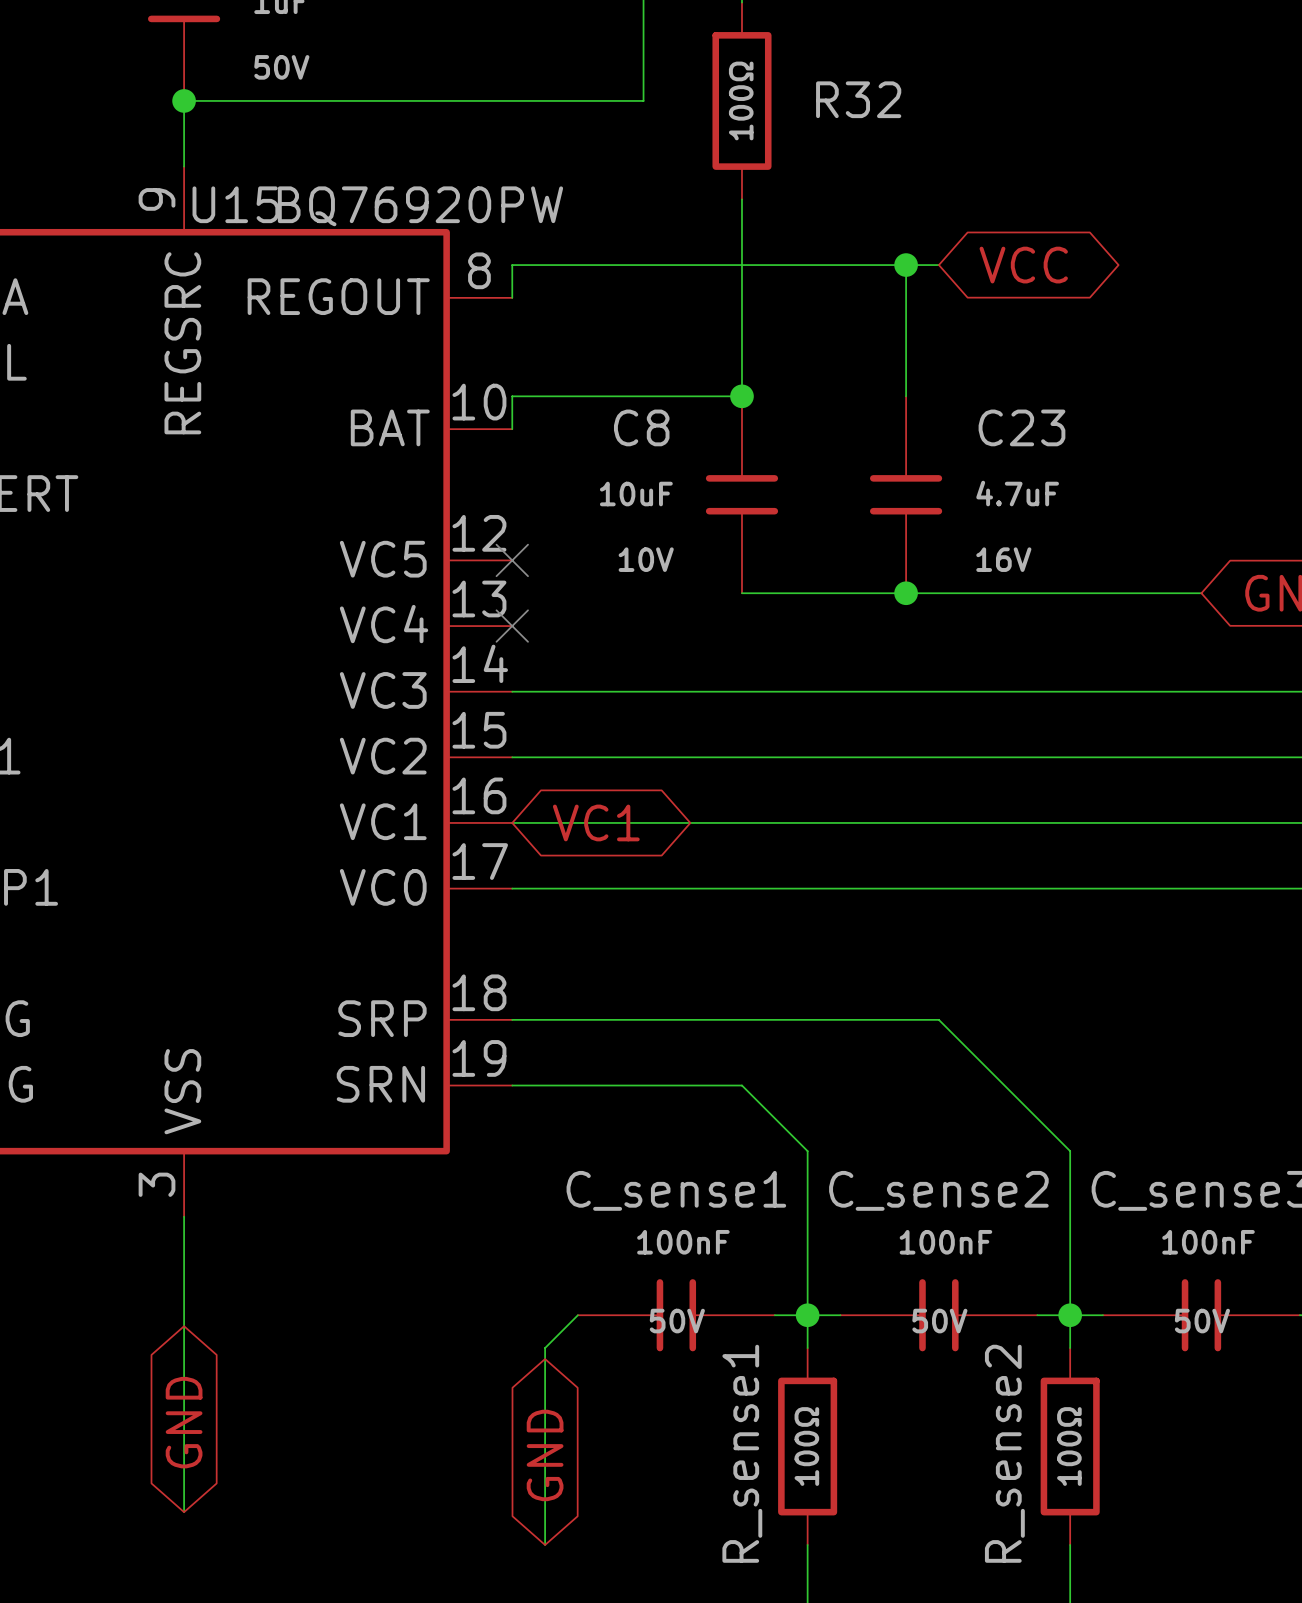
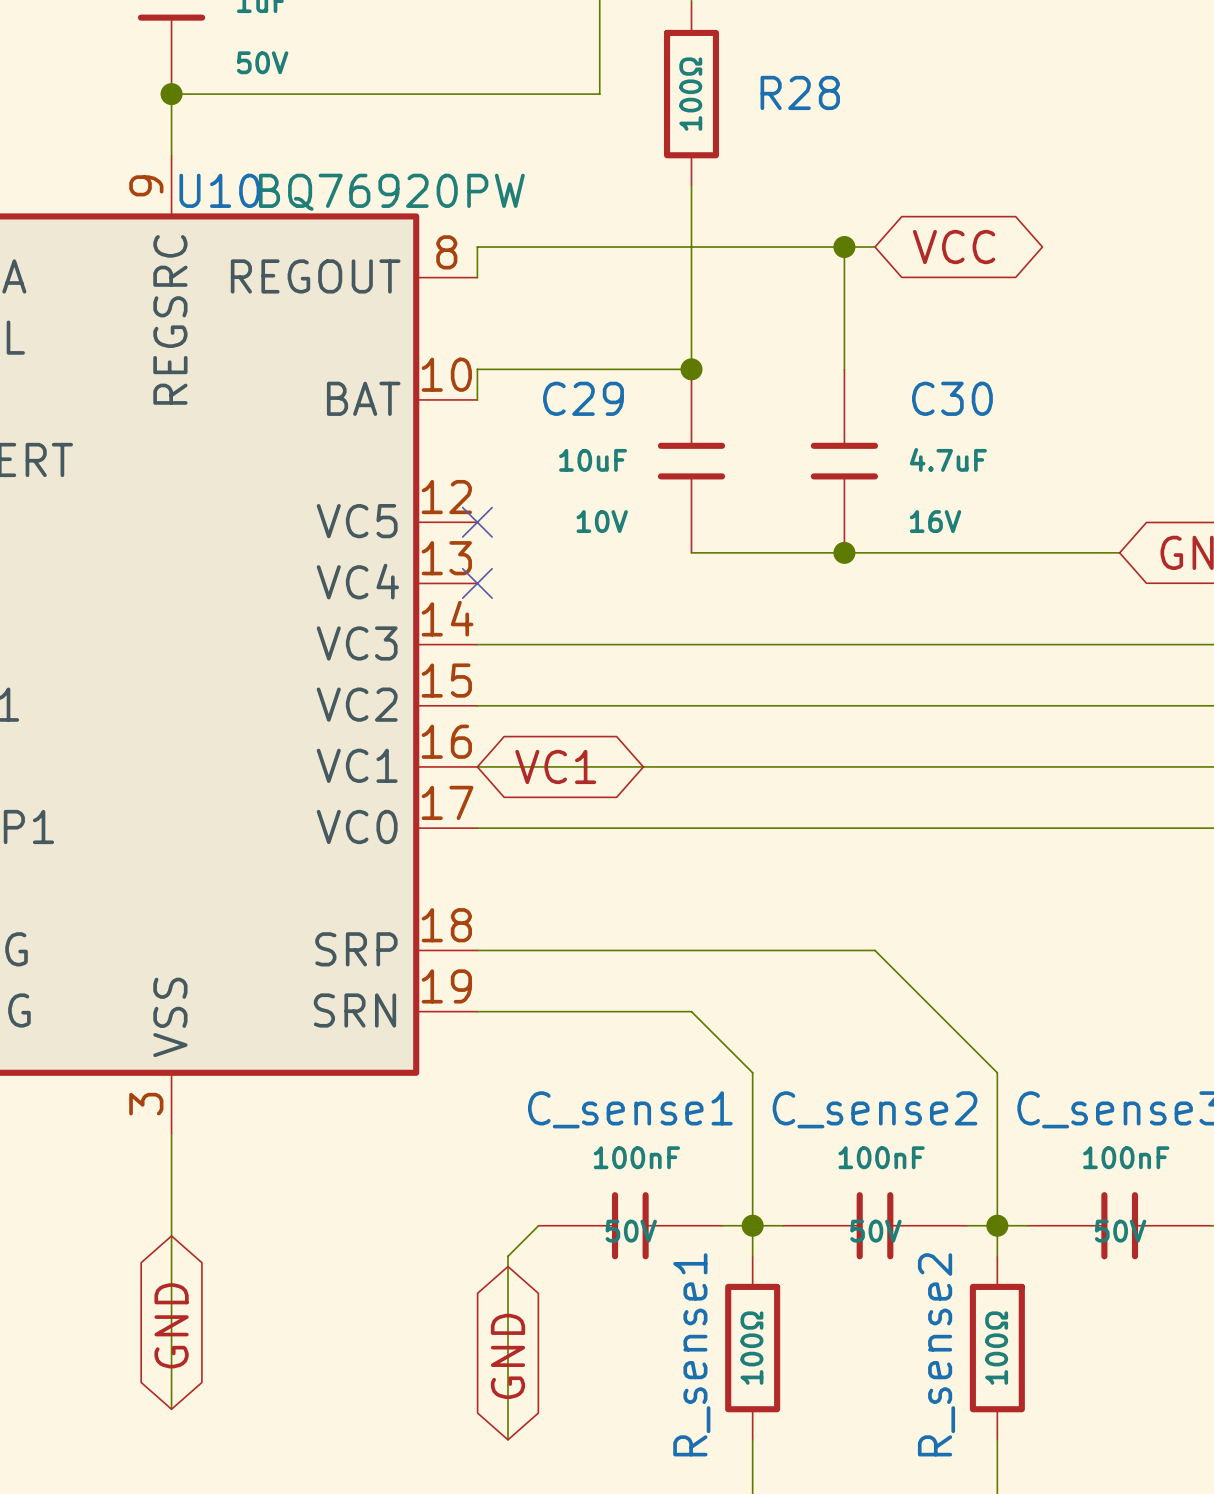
R32 name: R32 (858, 99) -> R28 (800, 92)
U15 name: U15 (235, 204) -> U10 (219, 190)
C8 name: C8 (641, 427) -> C29 (583, 398)
C23 name: C23 (1021, 427) -> C30 (952, 398)

